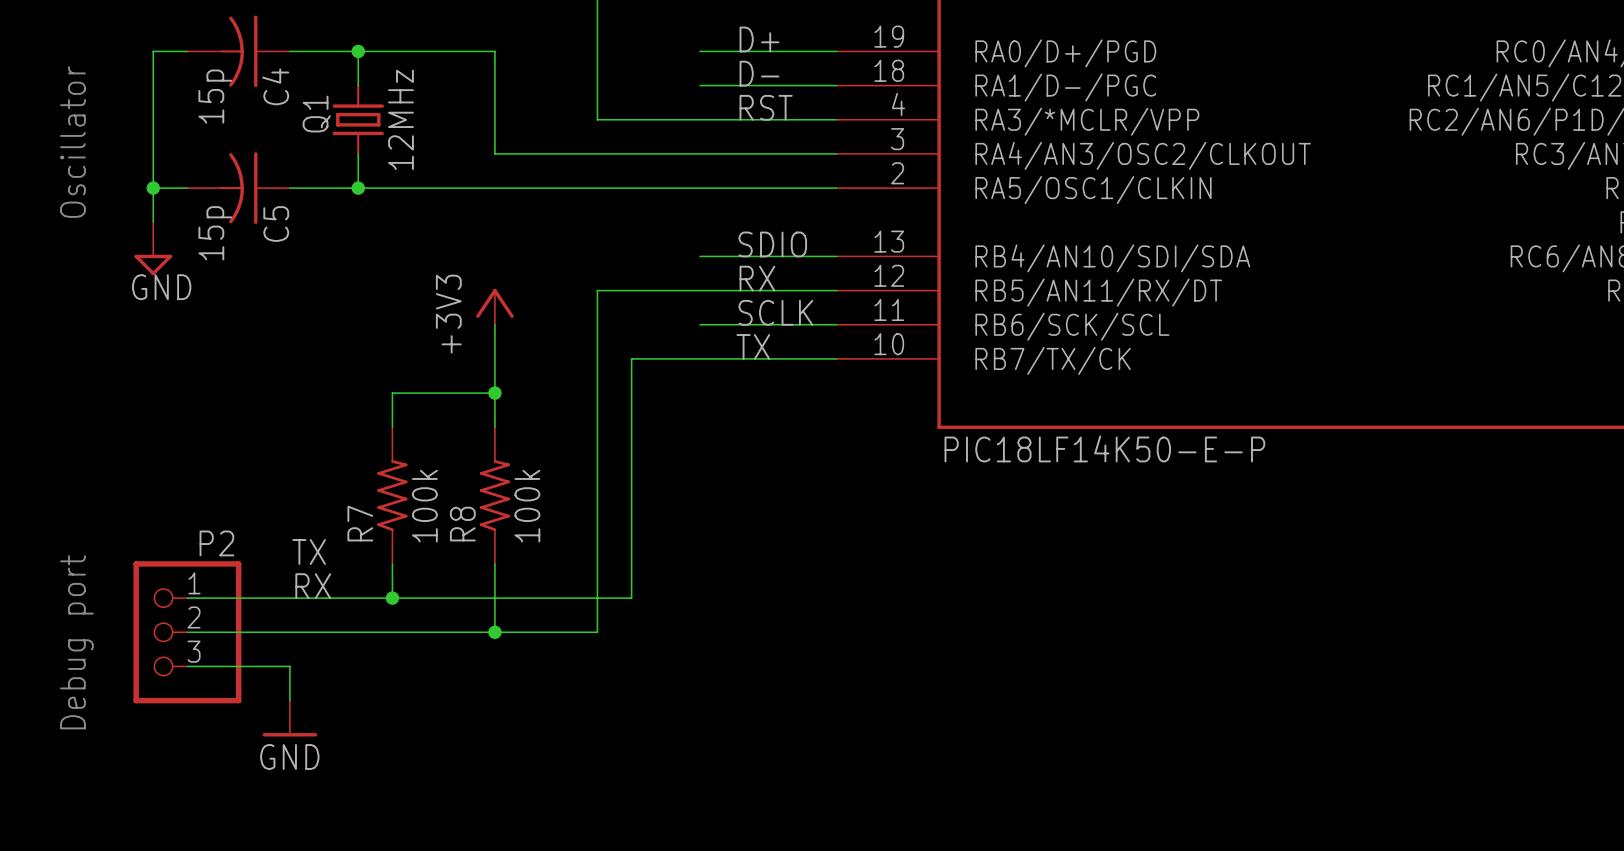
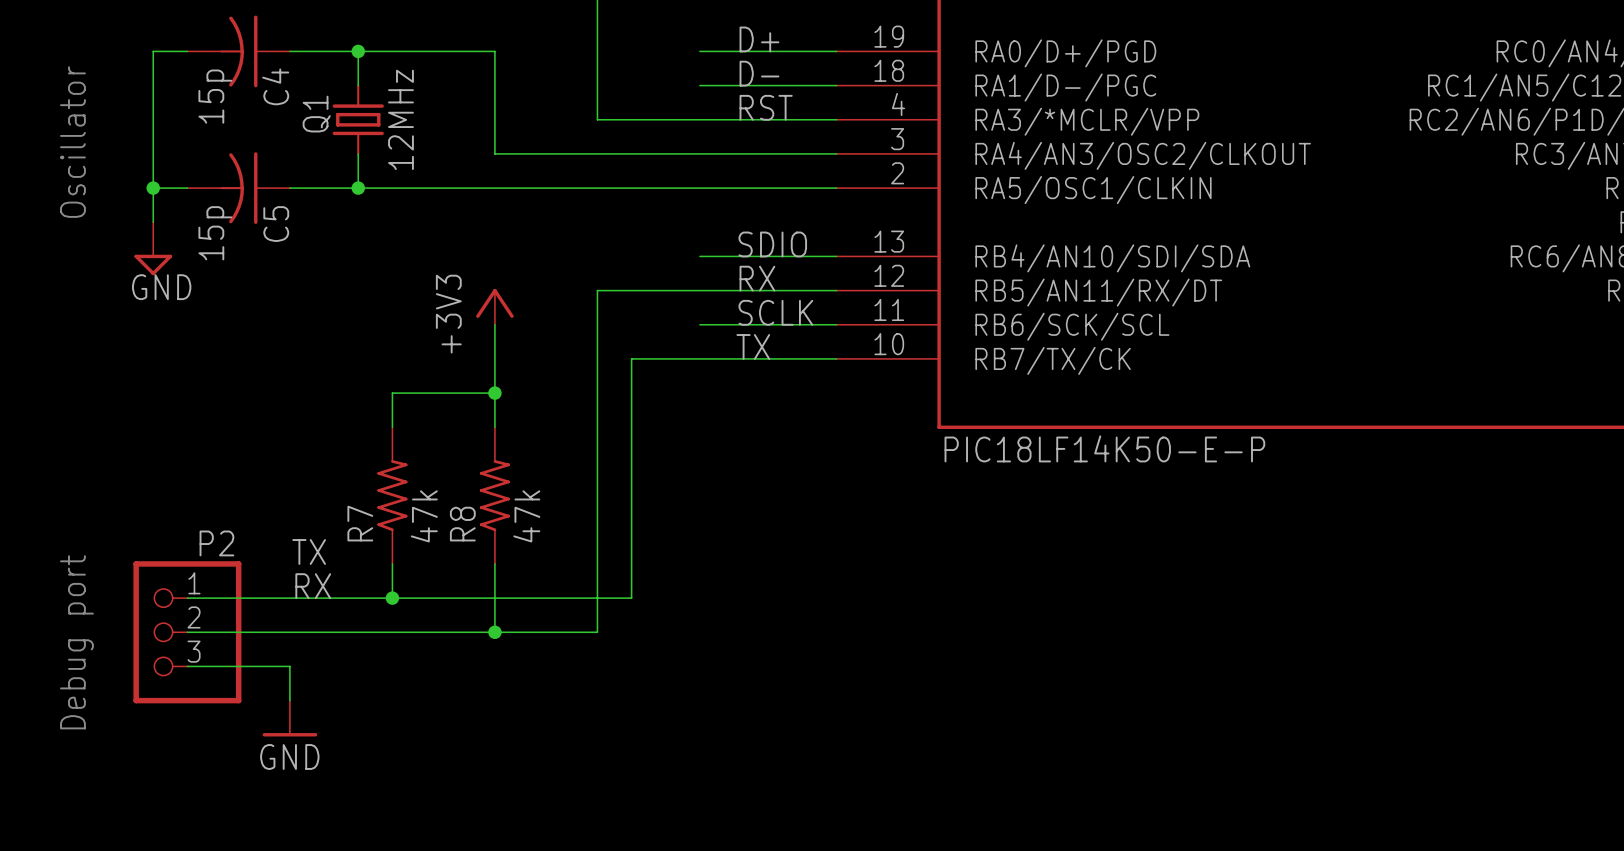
R7 value: 100k (424, 506) -> 47k (424, 516)
R8 value: 100k (527, 506) -> 47k (526, 516)

